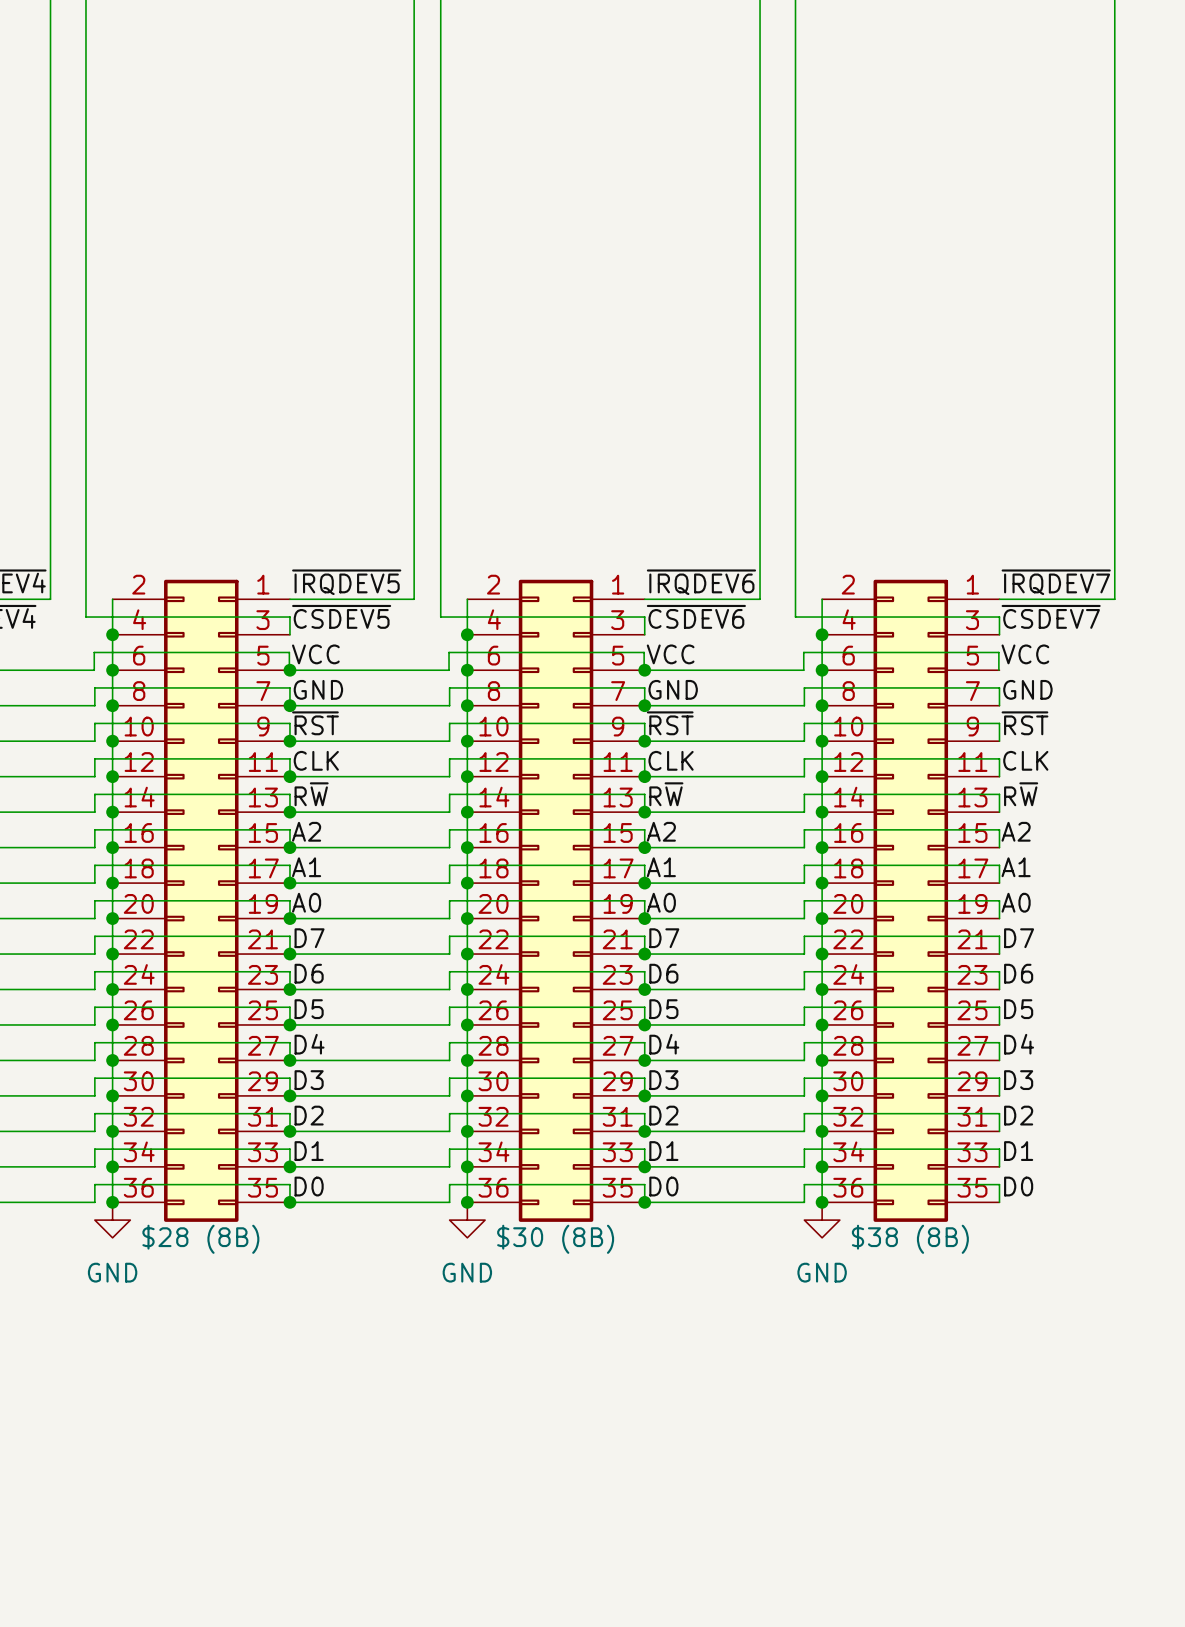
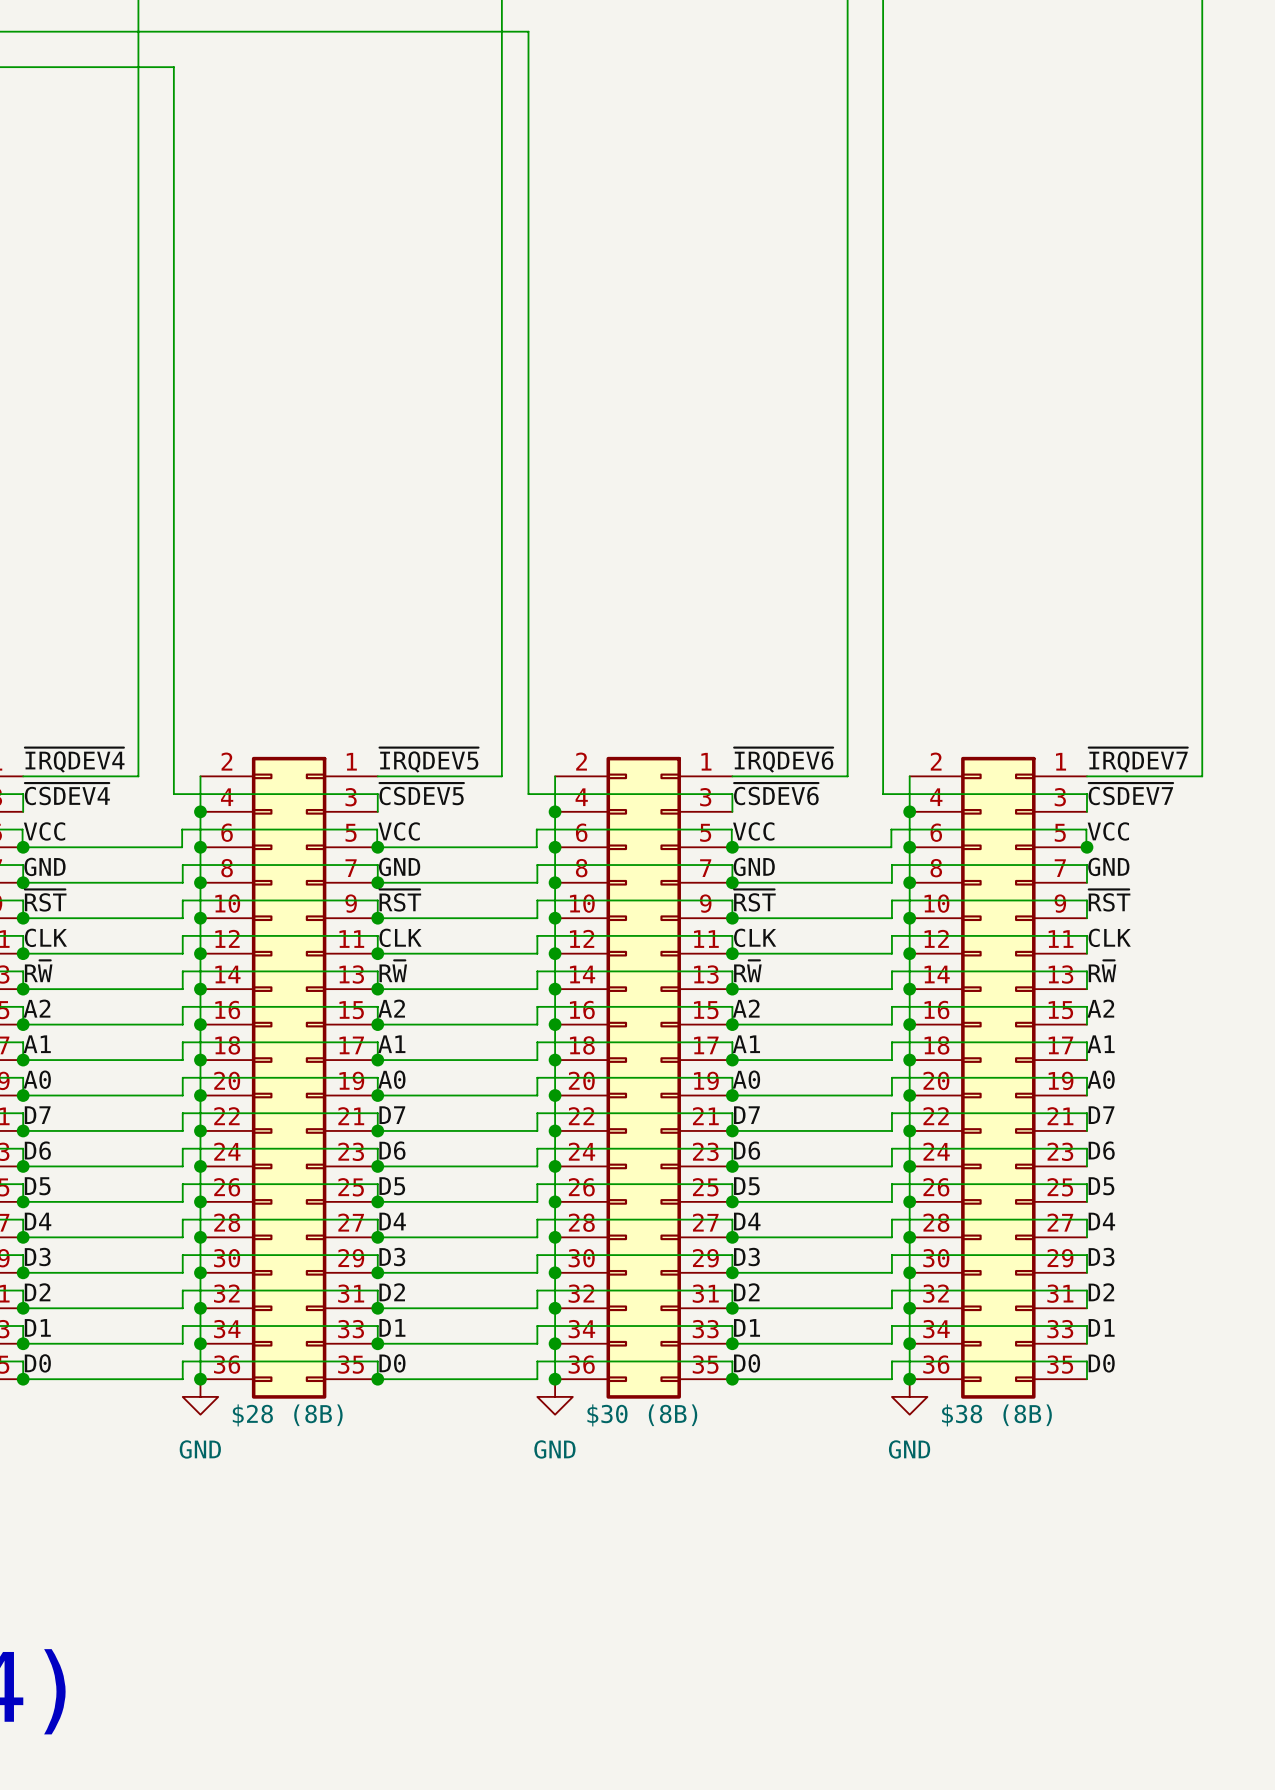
junction: none -> (1086, 847)

